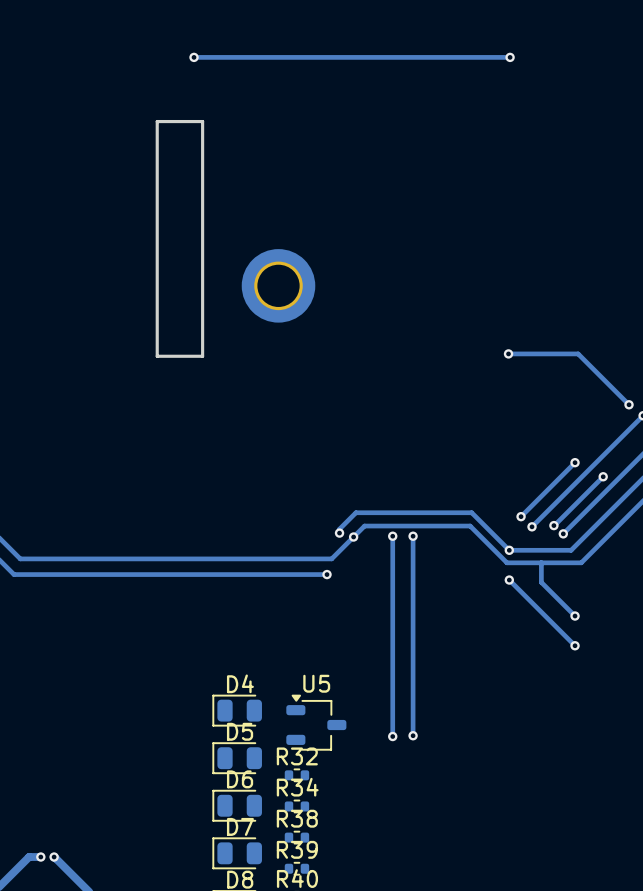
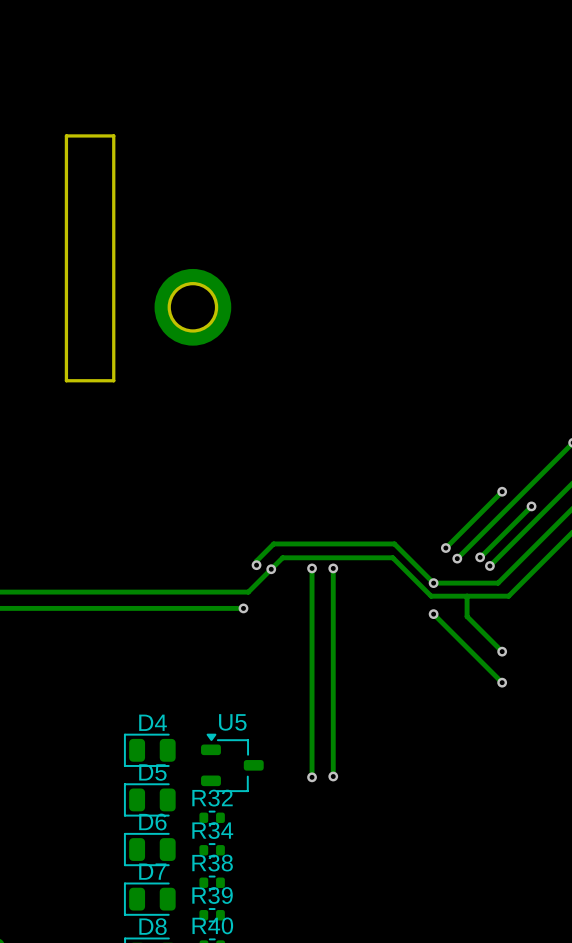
via: (194, 57) -> none
track: (510, 57) (194, 57) -> none
via: (510, 57) -> none
track: (508, 353) (578, 353) (629, 404) -> none
via: (508, 353) -> none
via: (629, 404) -> none

